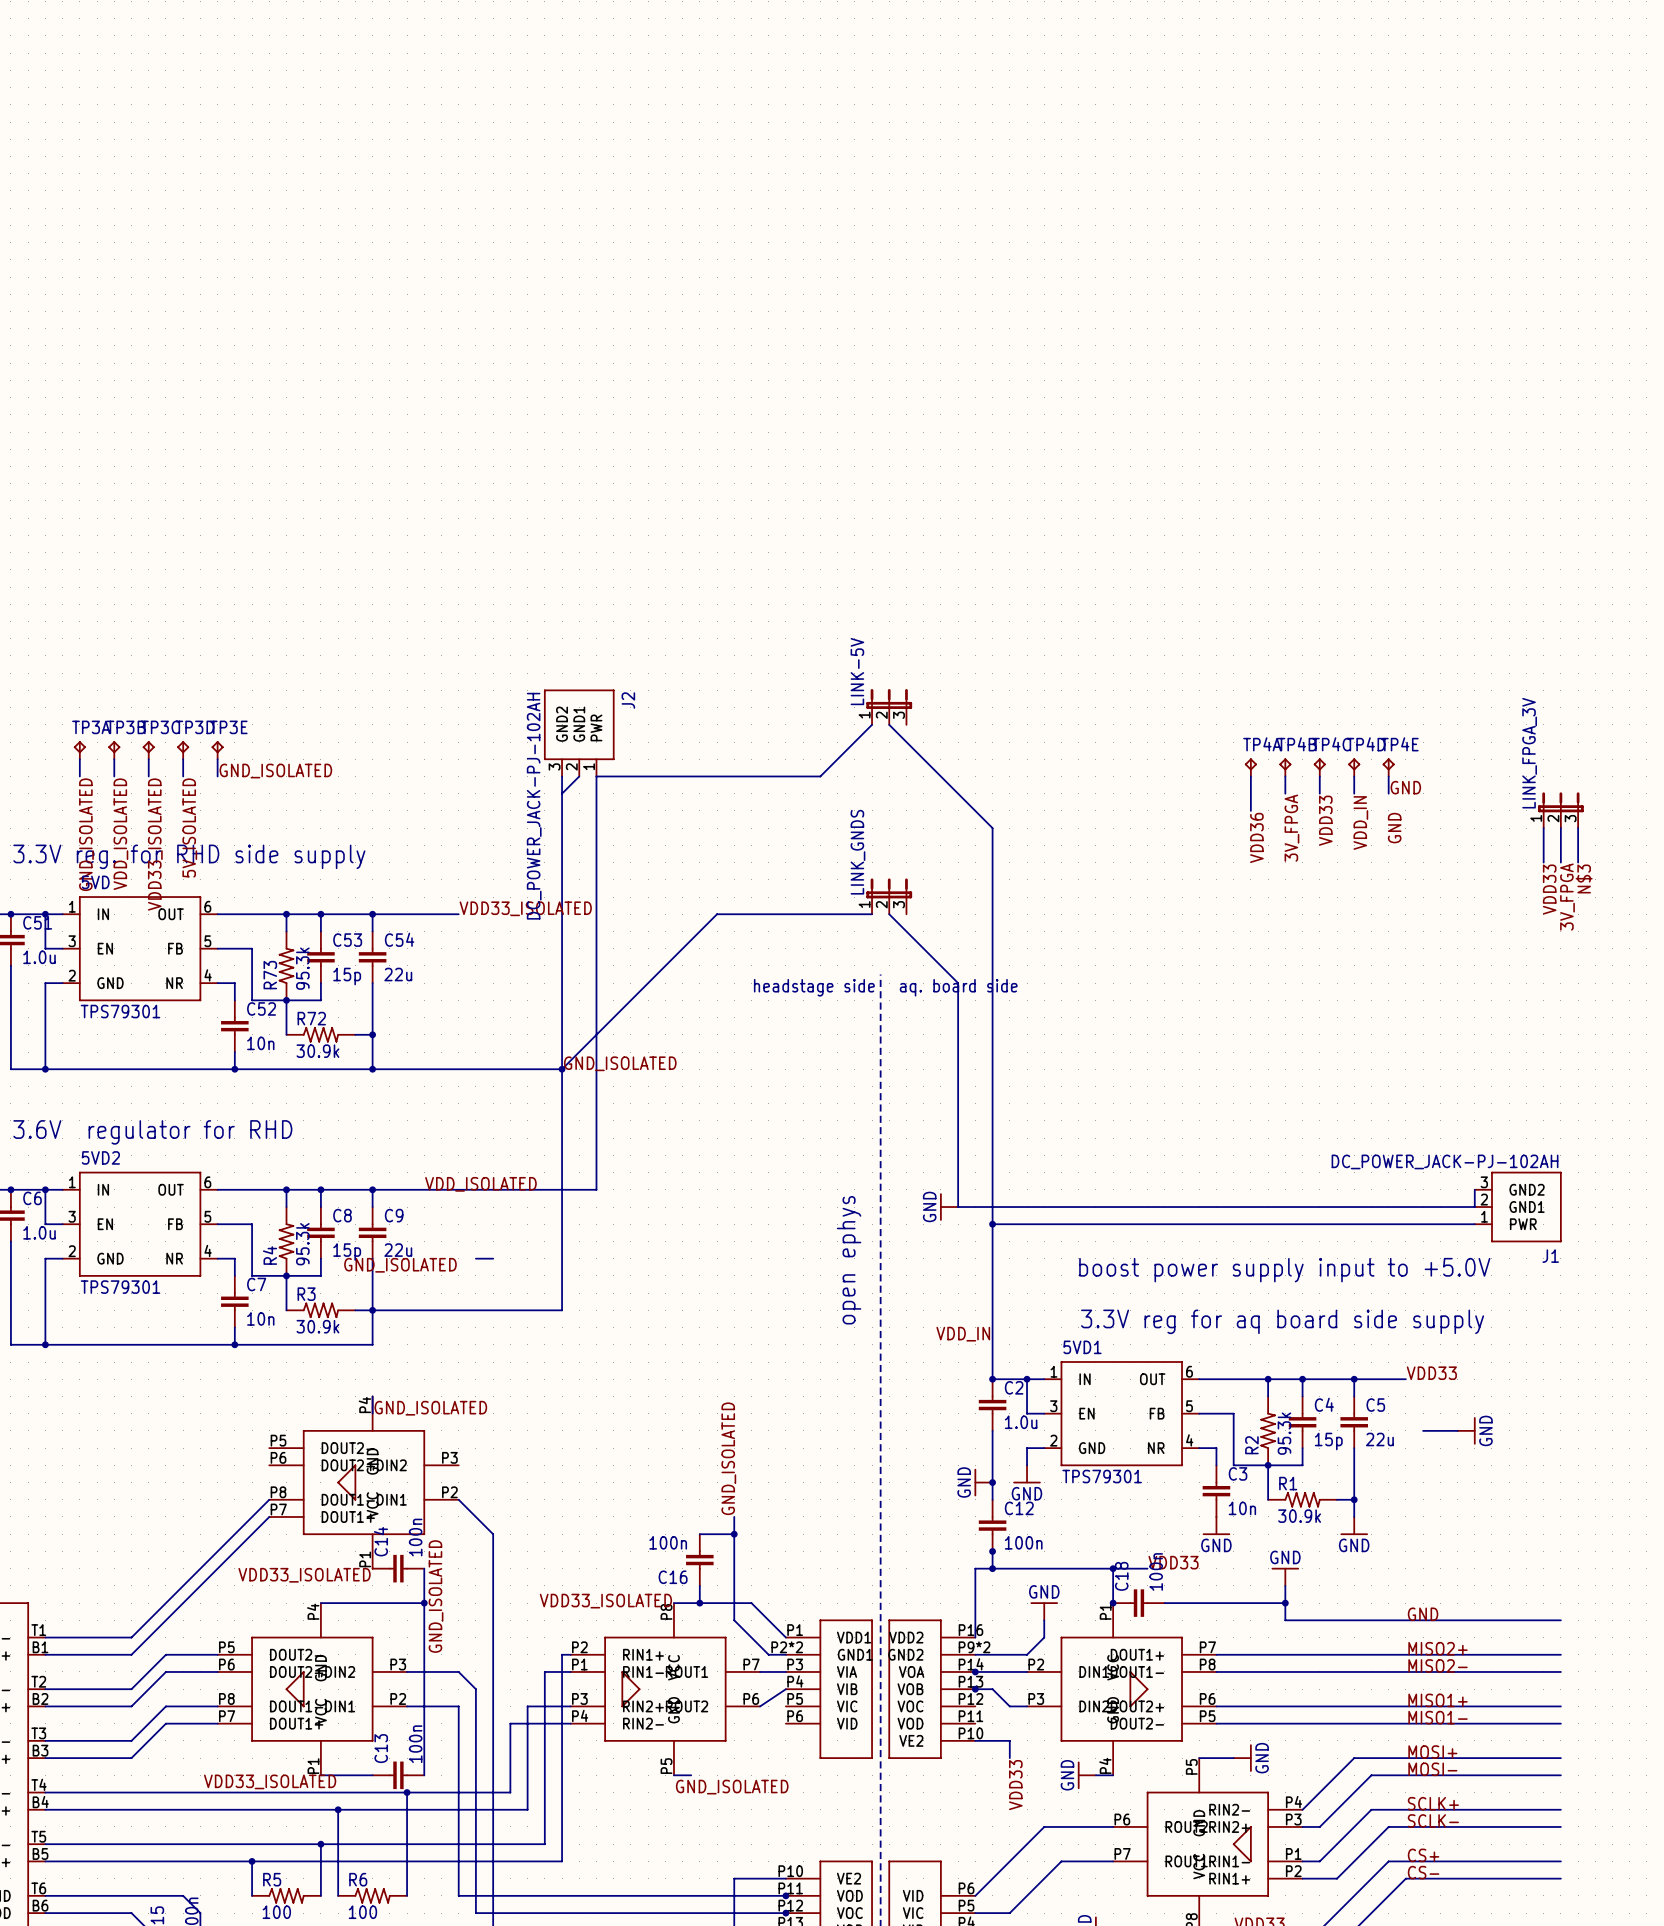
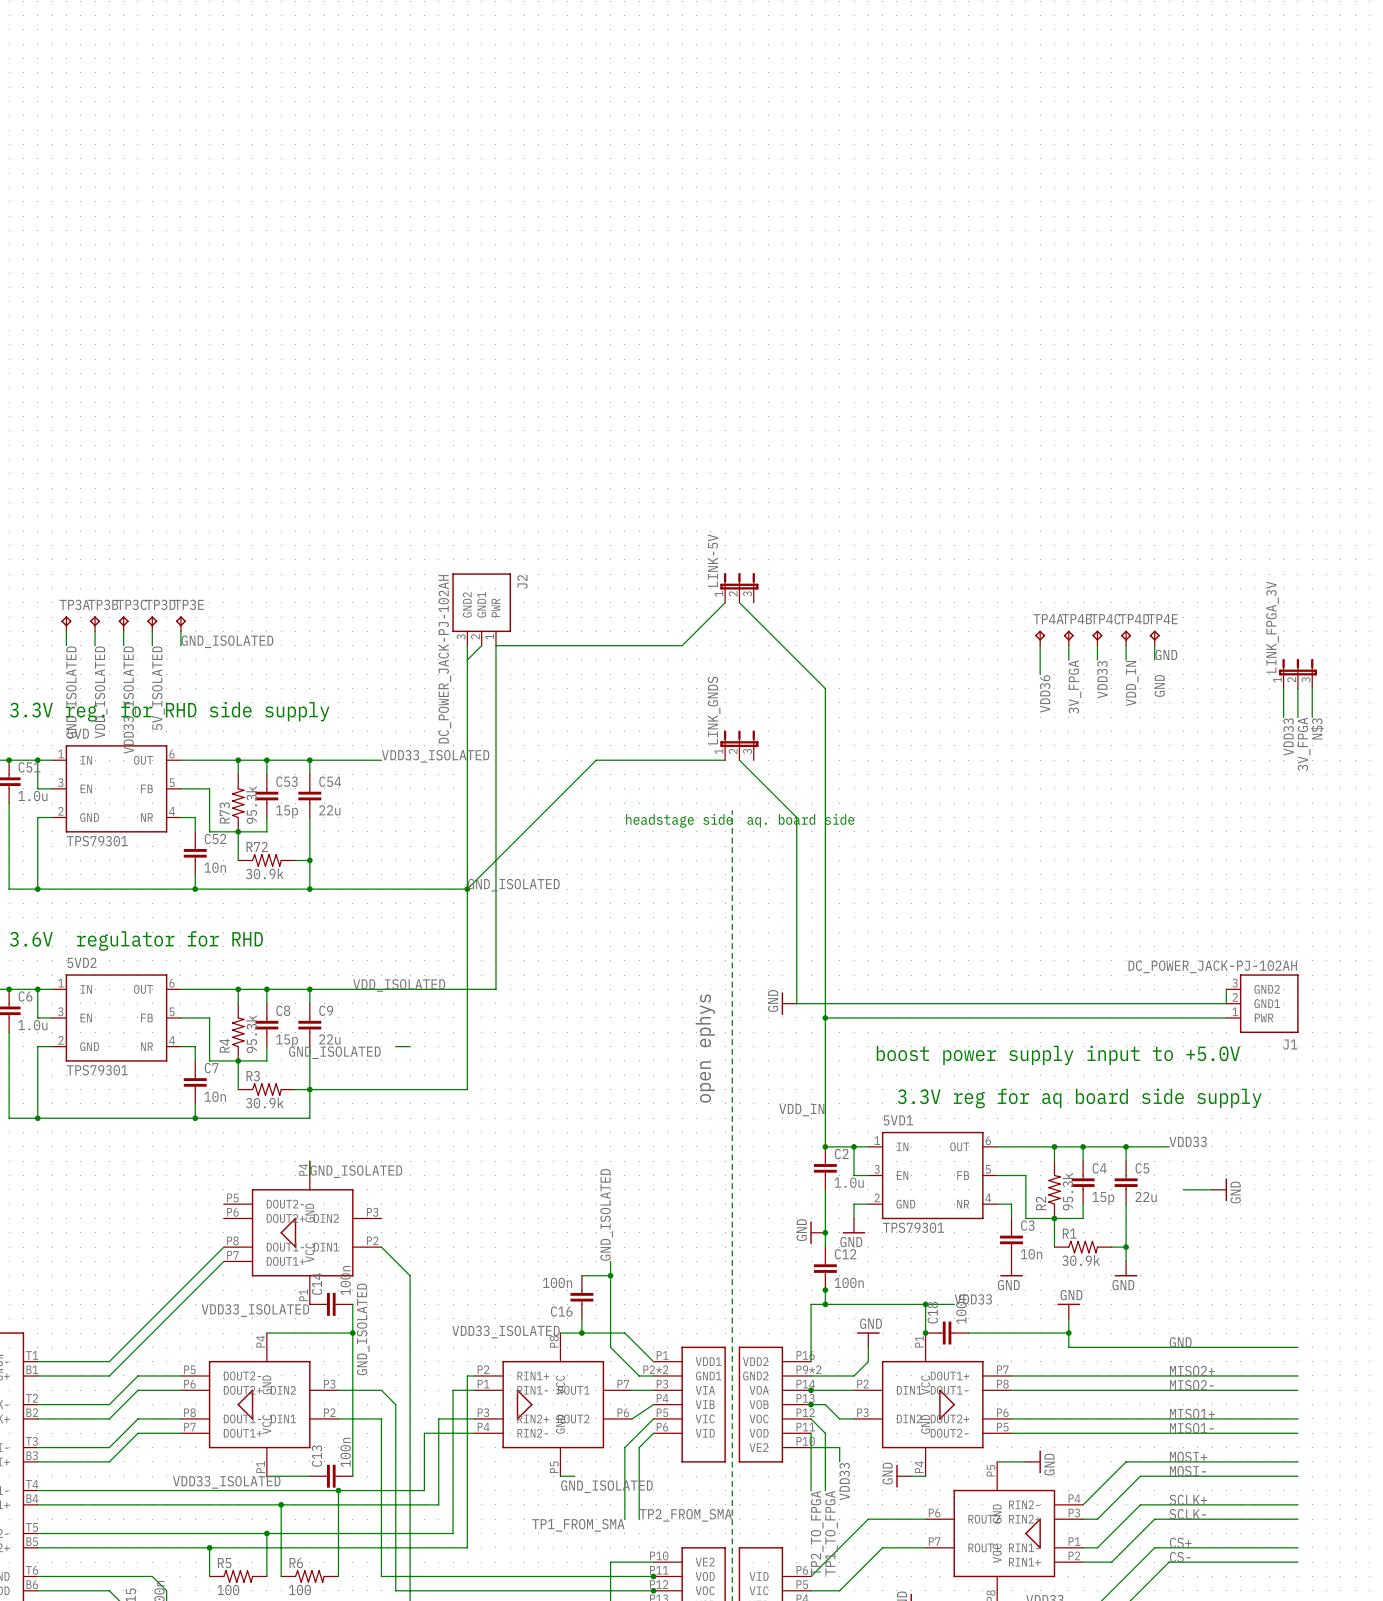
wire: none -> (653, 1418) (624, 1447) (624, 1519)
wire: none -> (811, 1418) (825, 1433) (825, 1490)
wire: none -> (653, 1433) (639, 1447) (639, 1519)
wire: none -> (811, 1433) (811, 1490)
label: none -> TP2_FROM_SMA (685, 1515)
label: none -> TP1_FROM_SMA (578, 1525)
label: none -> TP2_TO_FPGA (817, 1533)
label: none -> TP1_TO_FPGA (831, 1533)

